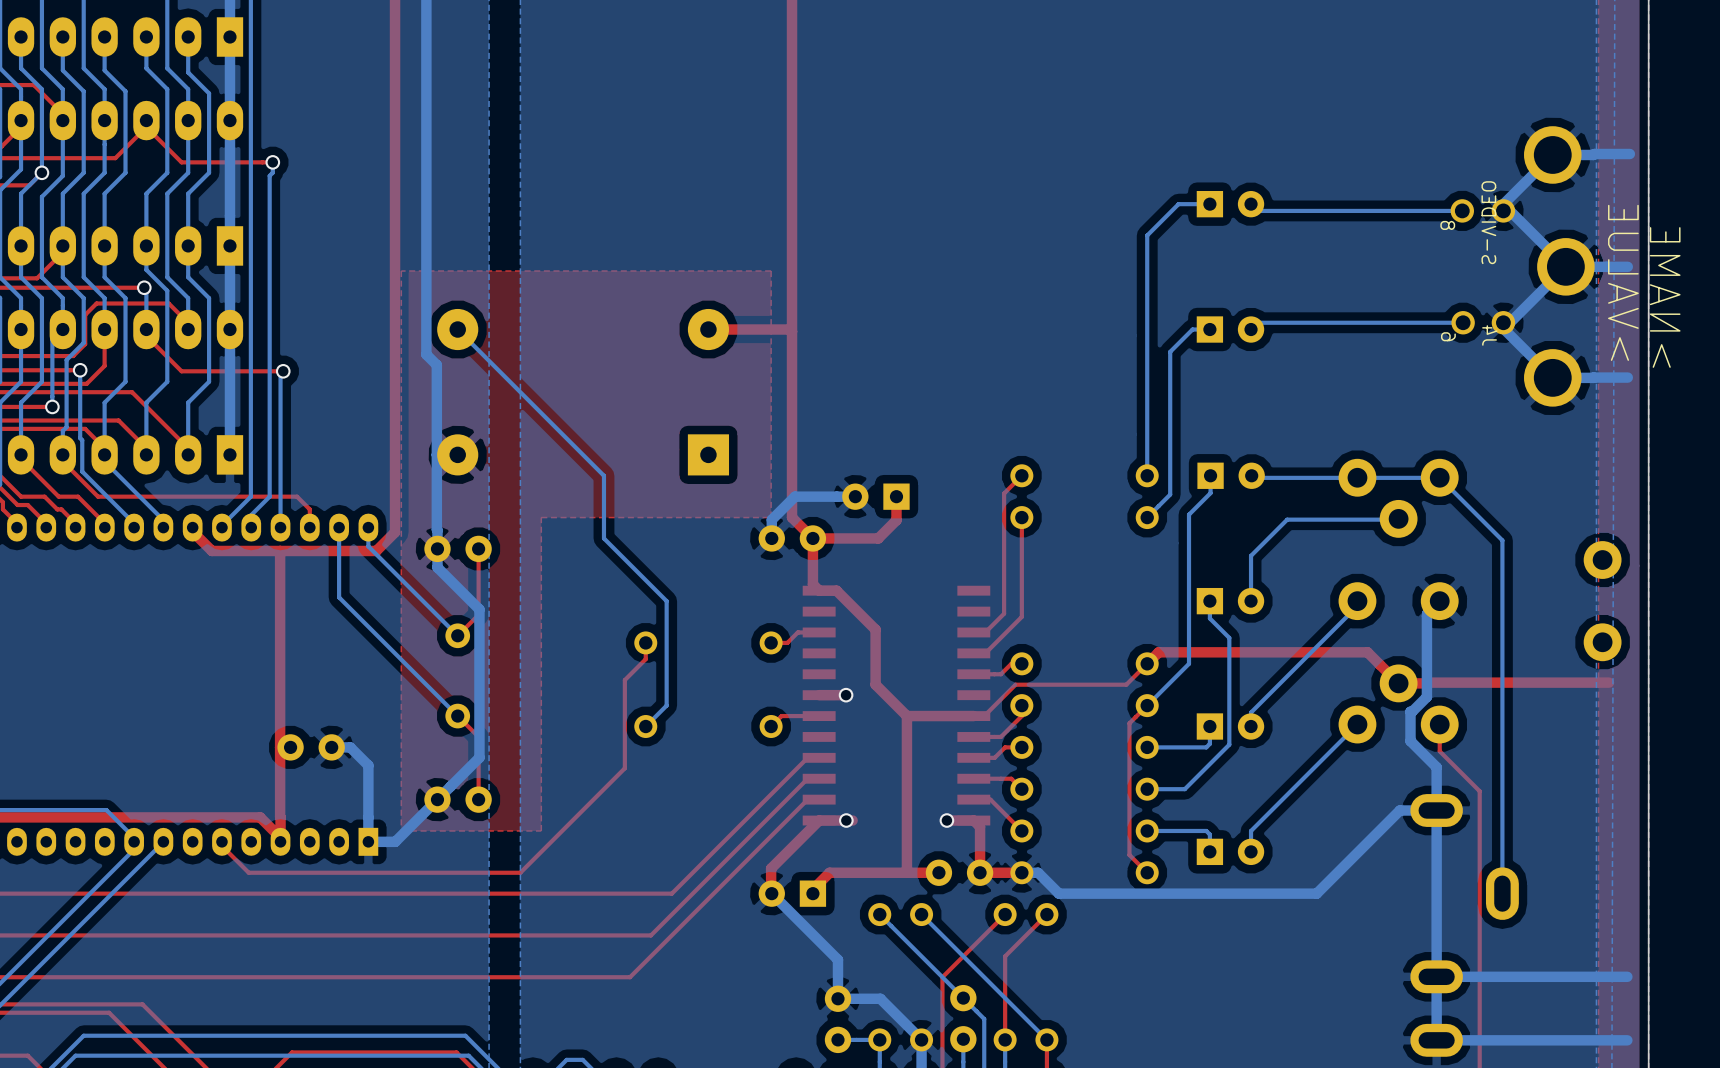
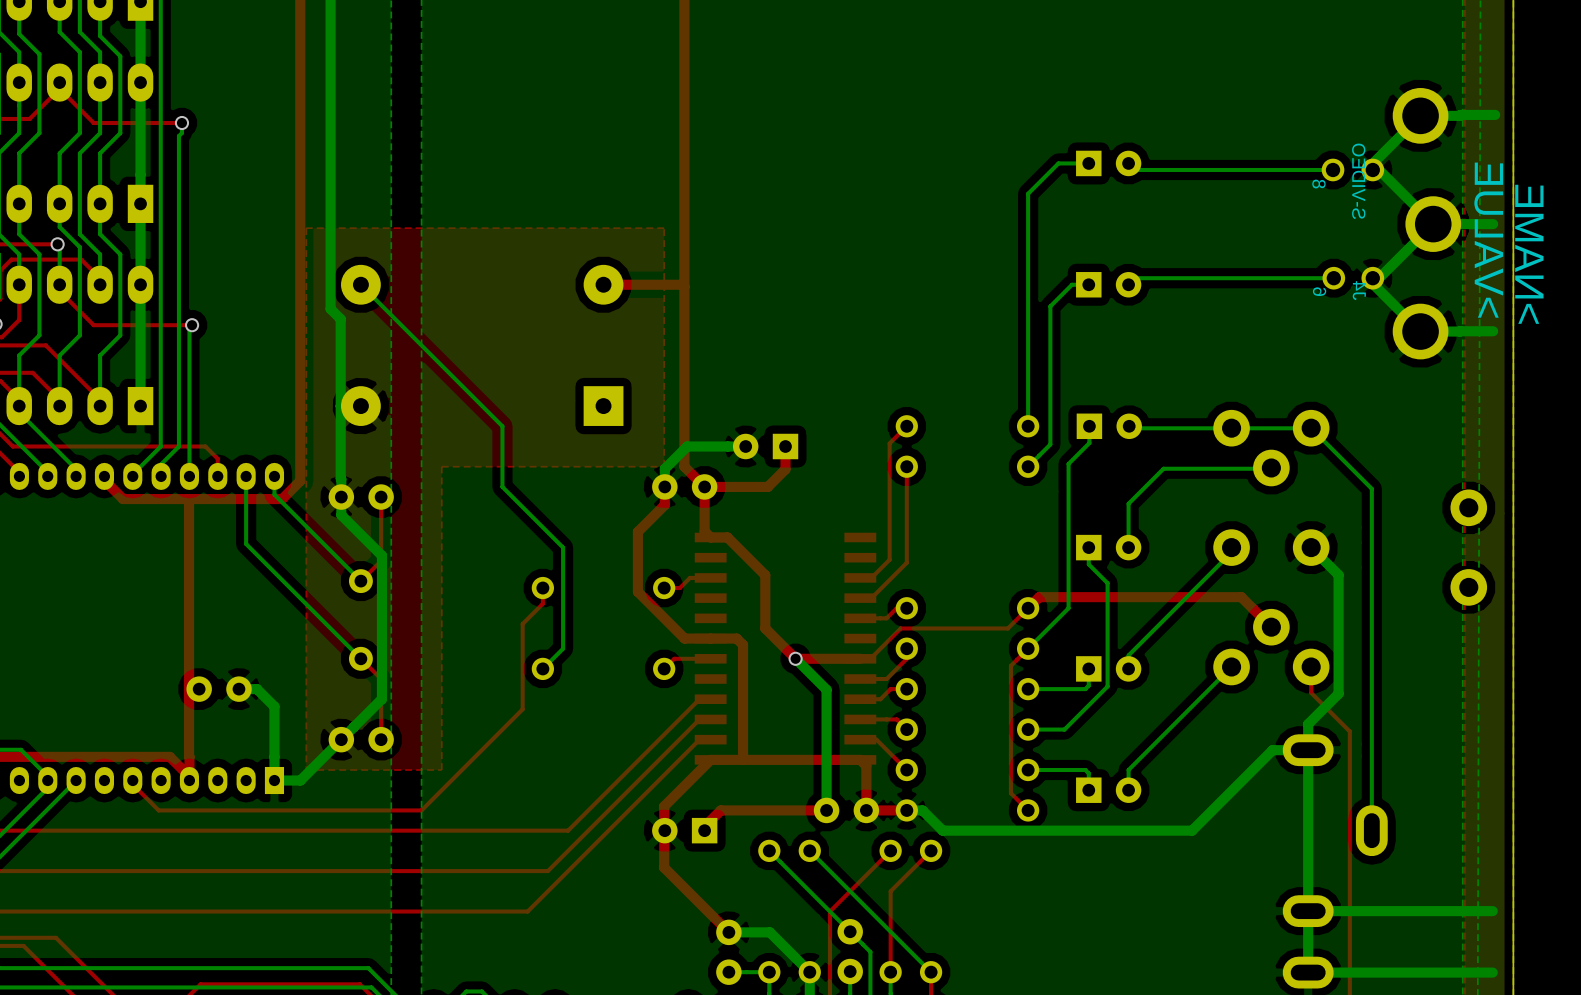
top track: none -> (664, 486) (664, 504) (637, 531) (637, 591) (684, 638) (710, 638)
bottom track: (1439, 601) (1427, 613) (1426, 696) (1410, 711) (1410, 741) (1436, 767) (1436, 783) -> (1311, 547) (1338, 575) (1338, 693) (1308, 724)
top track: (1608, 682) (1398, 683) -> none
top track: none -> (736, 638) (743, 644) (743, 759) (834, 759)
via: (846, 695) -> none
top track: (906, 716) (906, 870) (909, 872) -> none
bottom track: none -> (795, 658) (826, 689) (826, 810)
via: none -> (795, 658)
via: (846, 820) -> none
via: (946, 820) -> none
top track: none -> (664, 830) (664, 867) (728, 932)
bottom track: (771, 893) (837, 959) (837, 998) -> none

